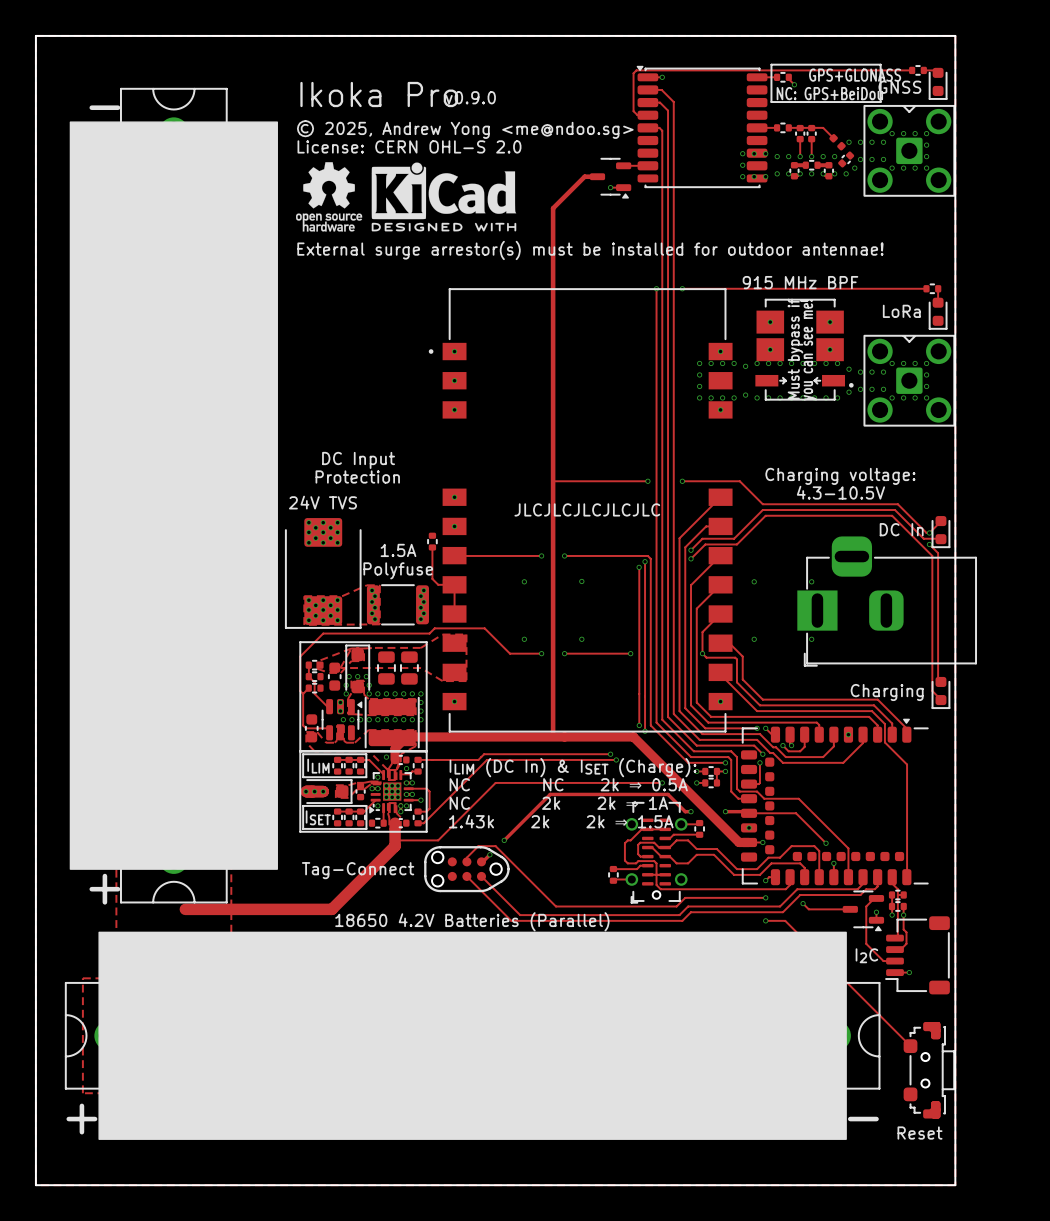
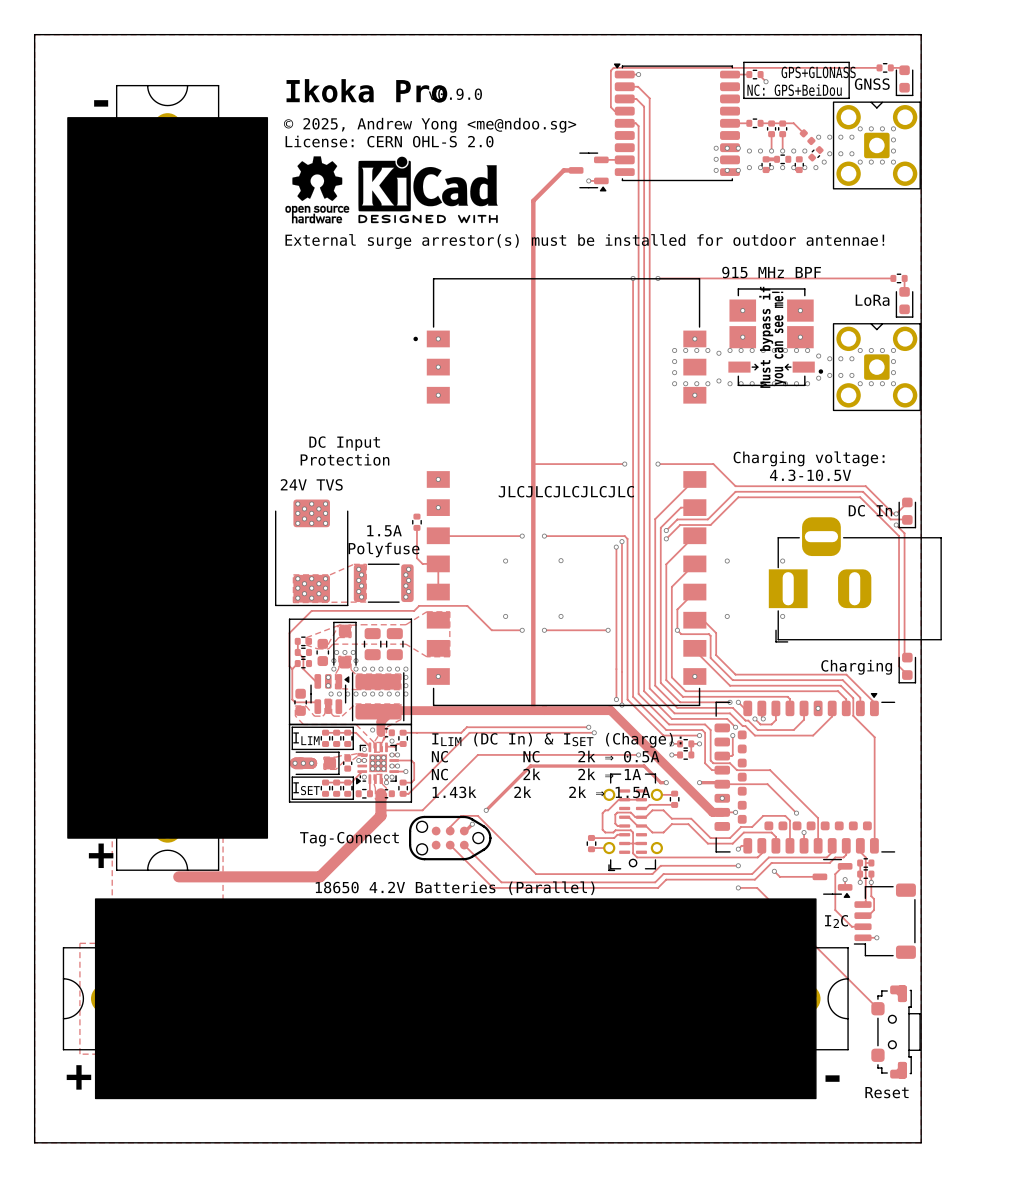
track: (817, 165) (828, 165) -> none

